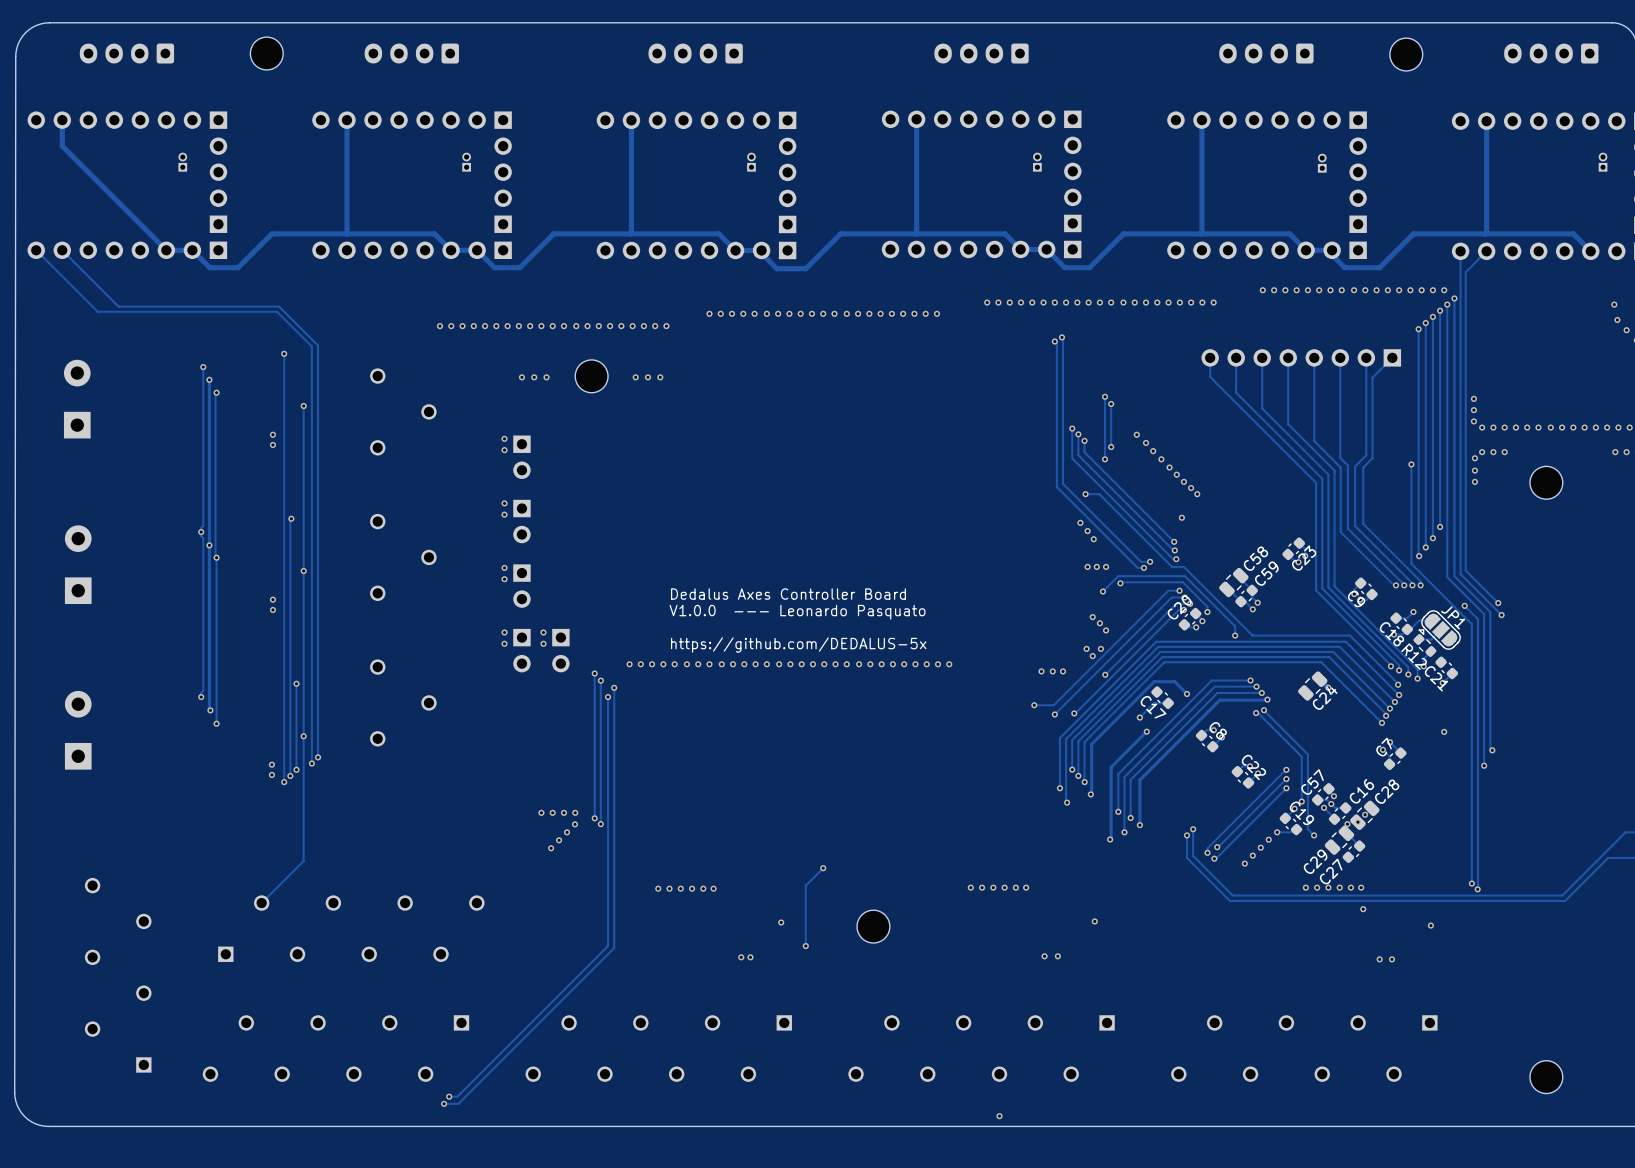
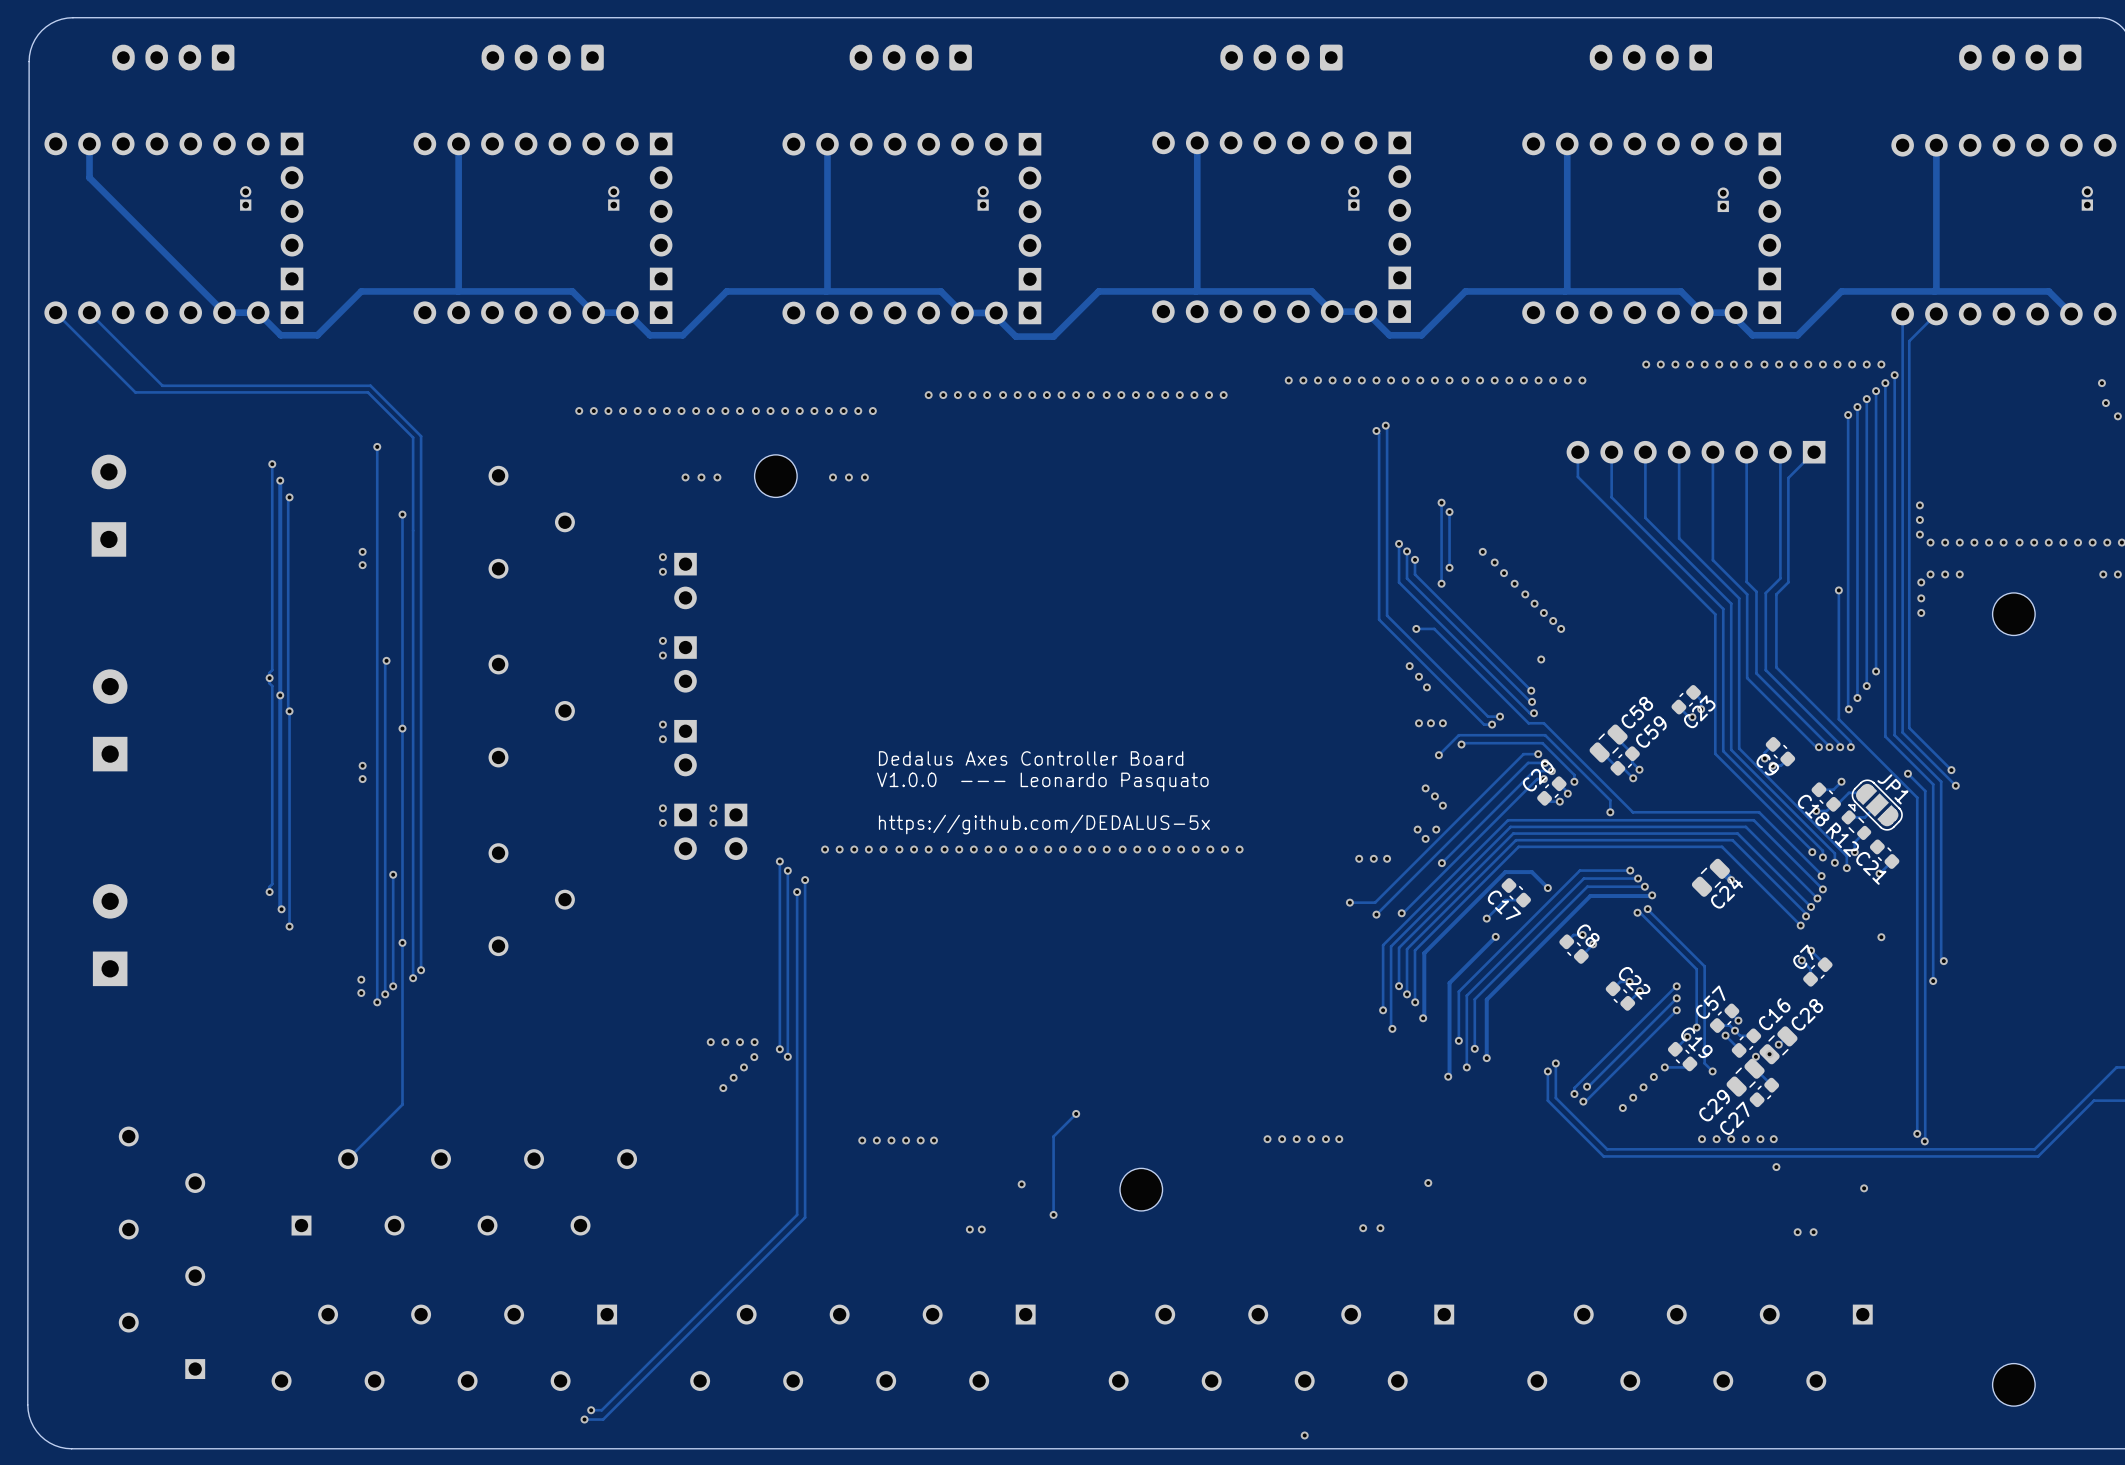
part: (266, 53) -> none
part: (1406, 54) -> none

